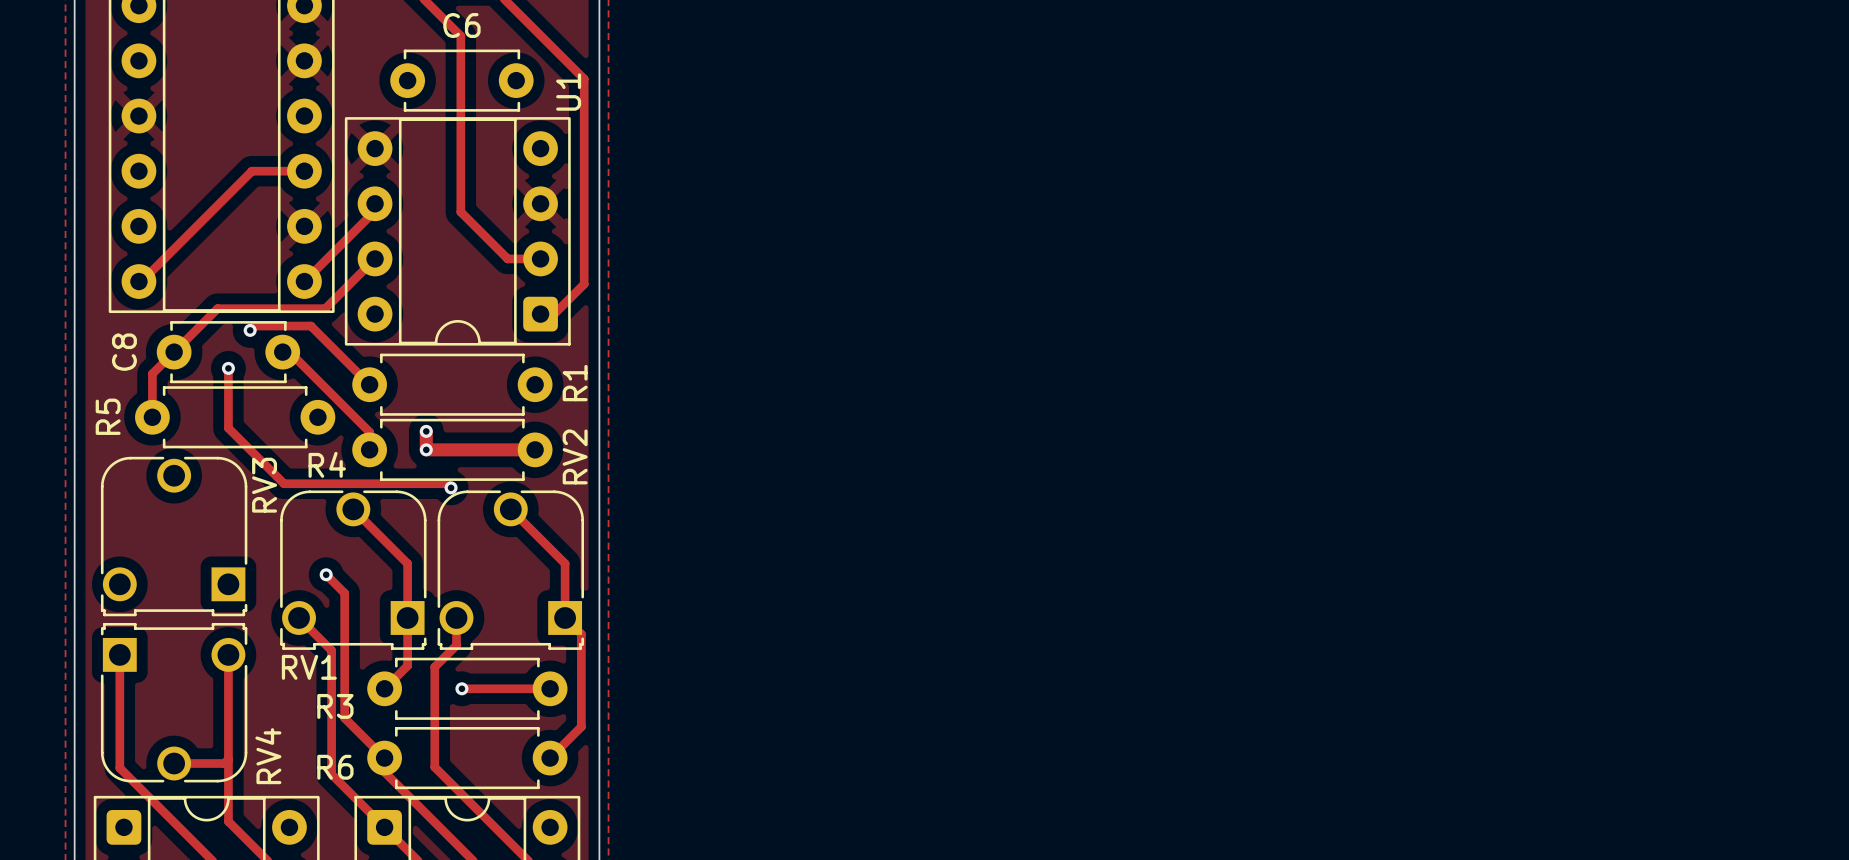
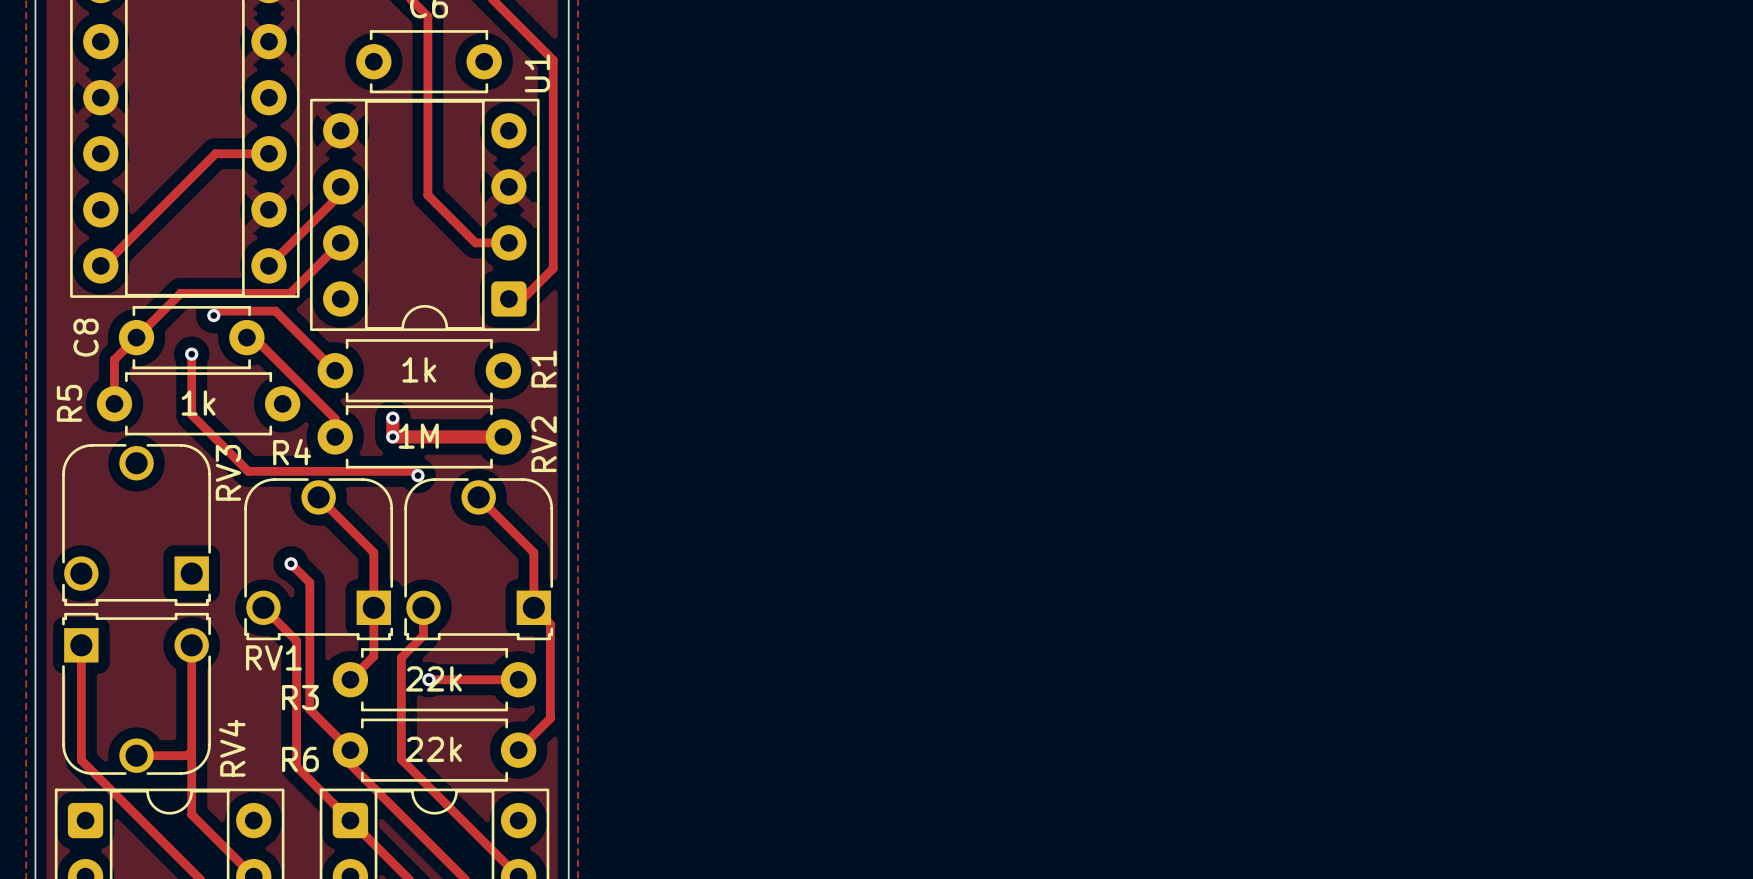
R1 value: none -> 1k (419, 369)
R5 value: none -> 1k (198, 403)
R4 value: none -> 1M (418, 436)
R3 value: none -> 22k (433, 678)
R6 value: none -> 22k (433, 749)

